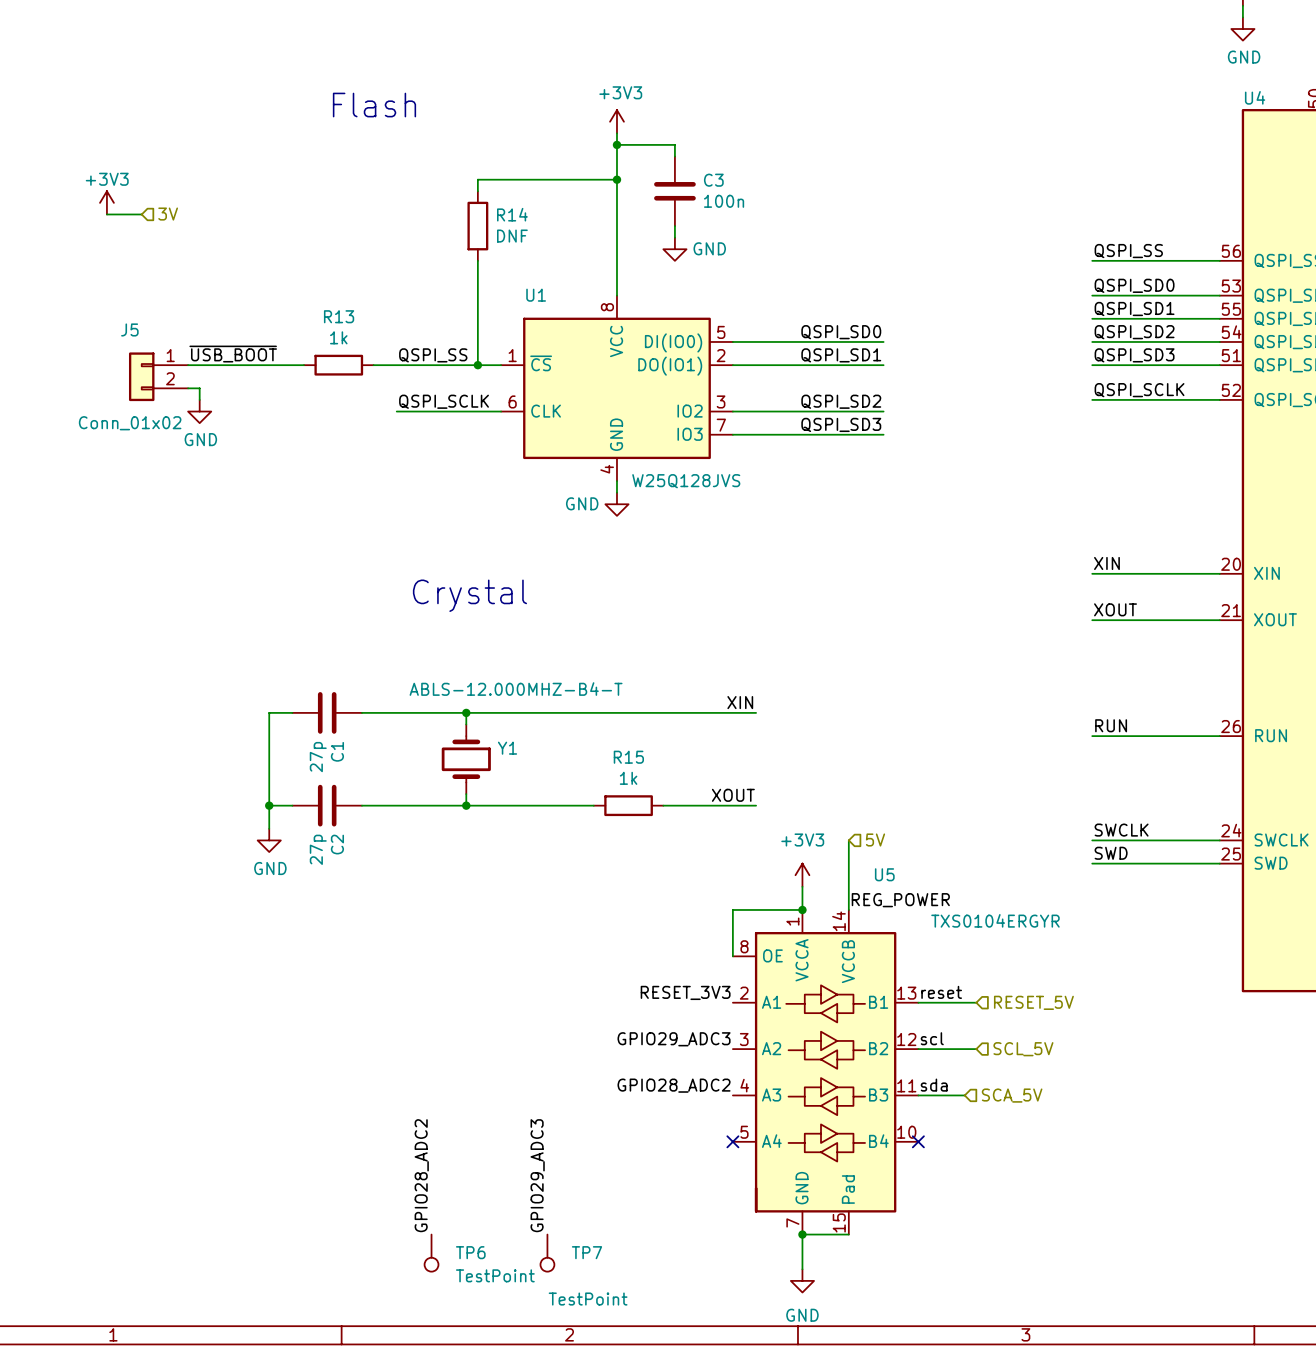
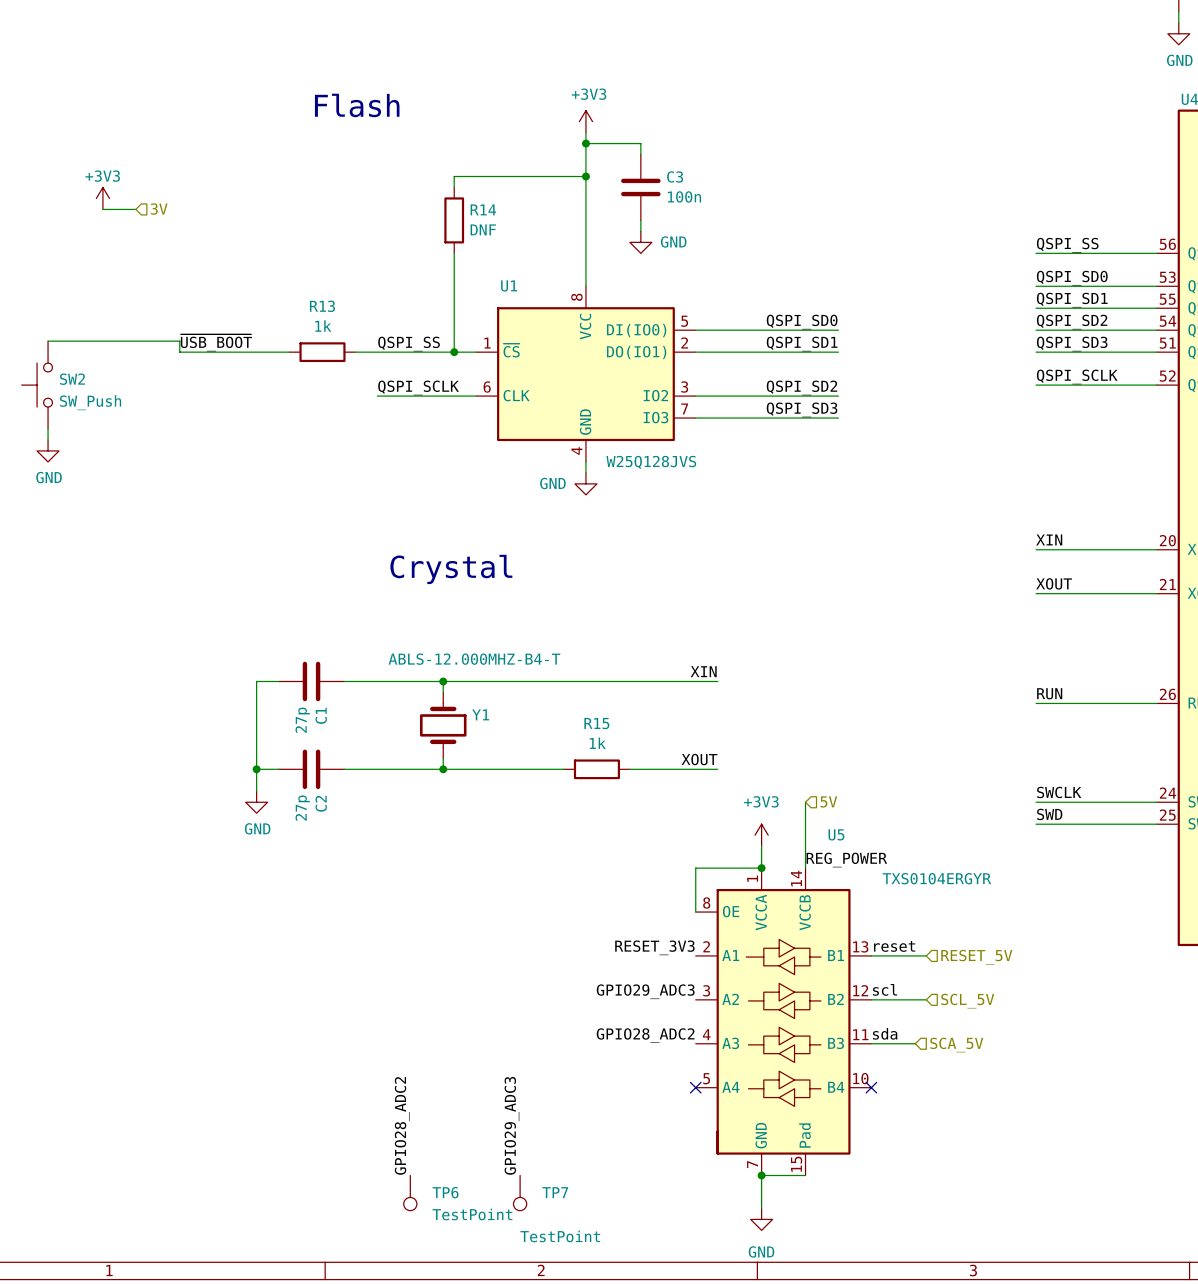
wire: none -> (48, 341) (179, 341) (179, 352)
J5: Conn_01x02 (158, 376) -> none
wire: (188, 388) (199, 388) (199, 399) -> none
SW2: none -> SW_Push (37, 385)
power symbol position: GND (199, 411) -> GND (48, 450)
wire: none -> (48, 429) (48, 439)

